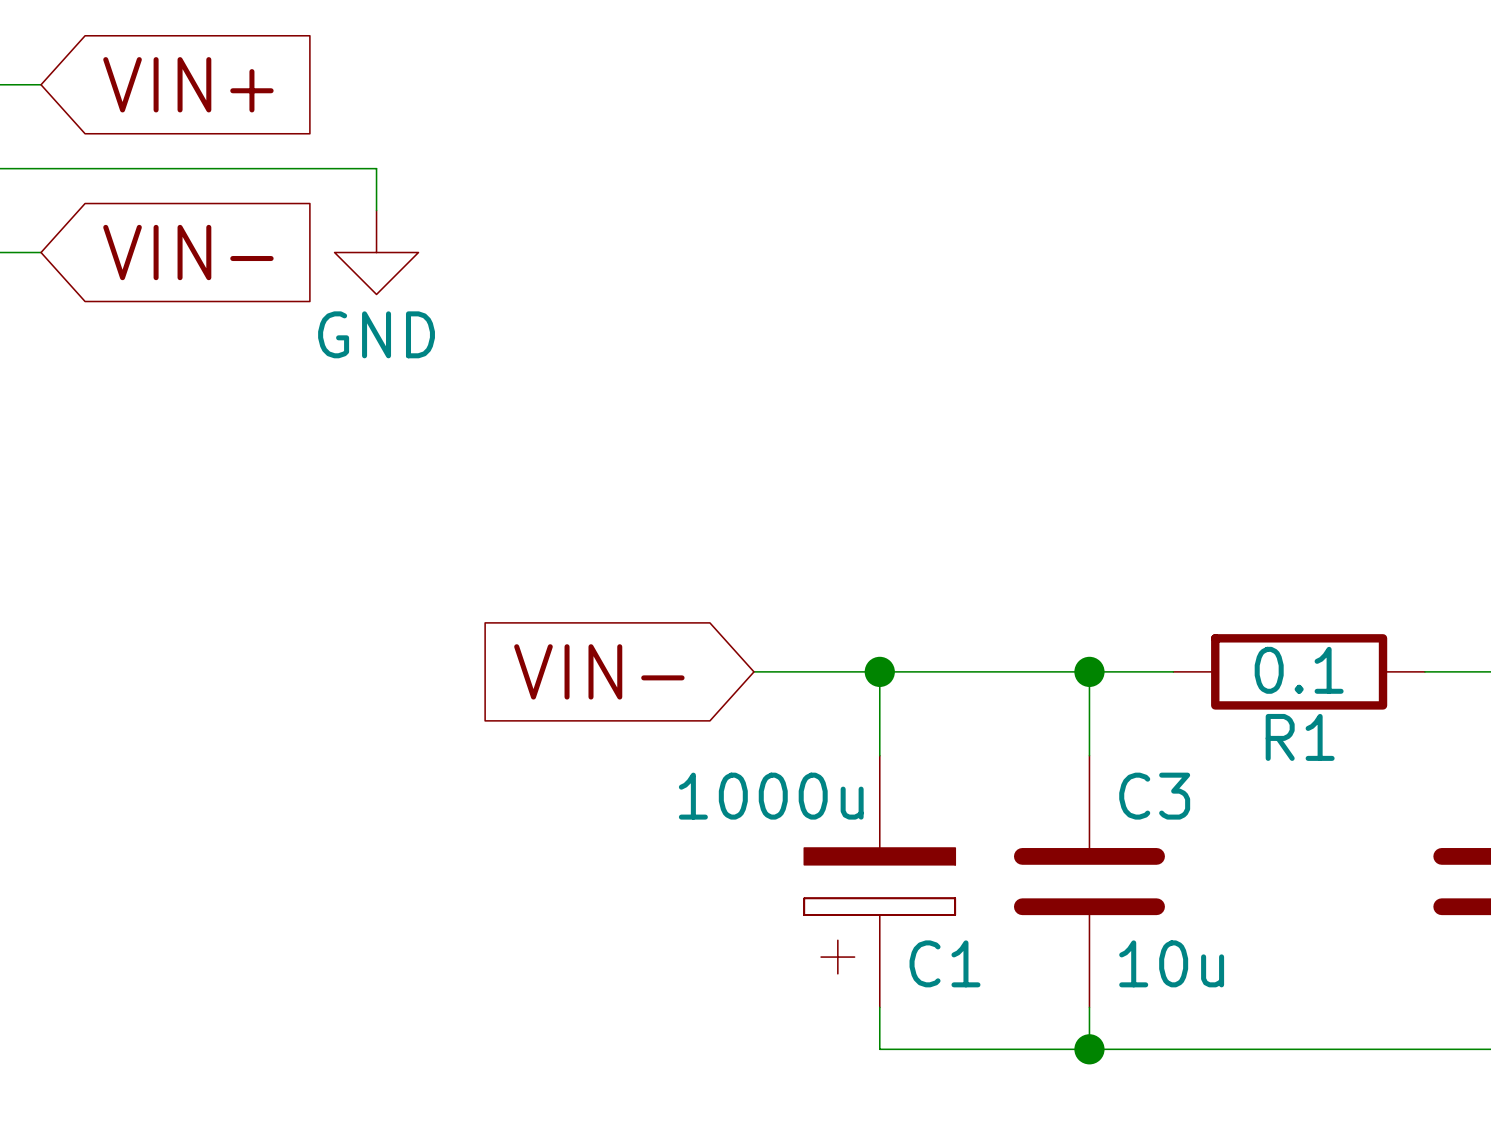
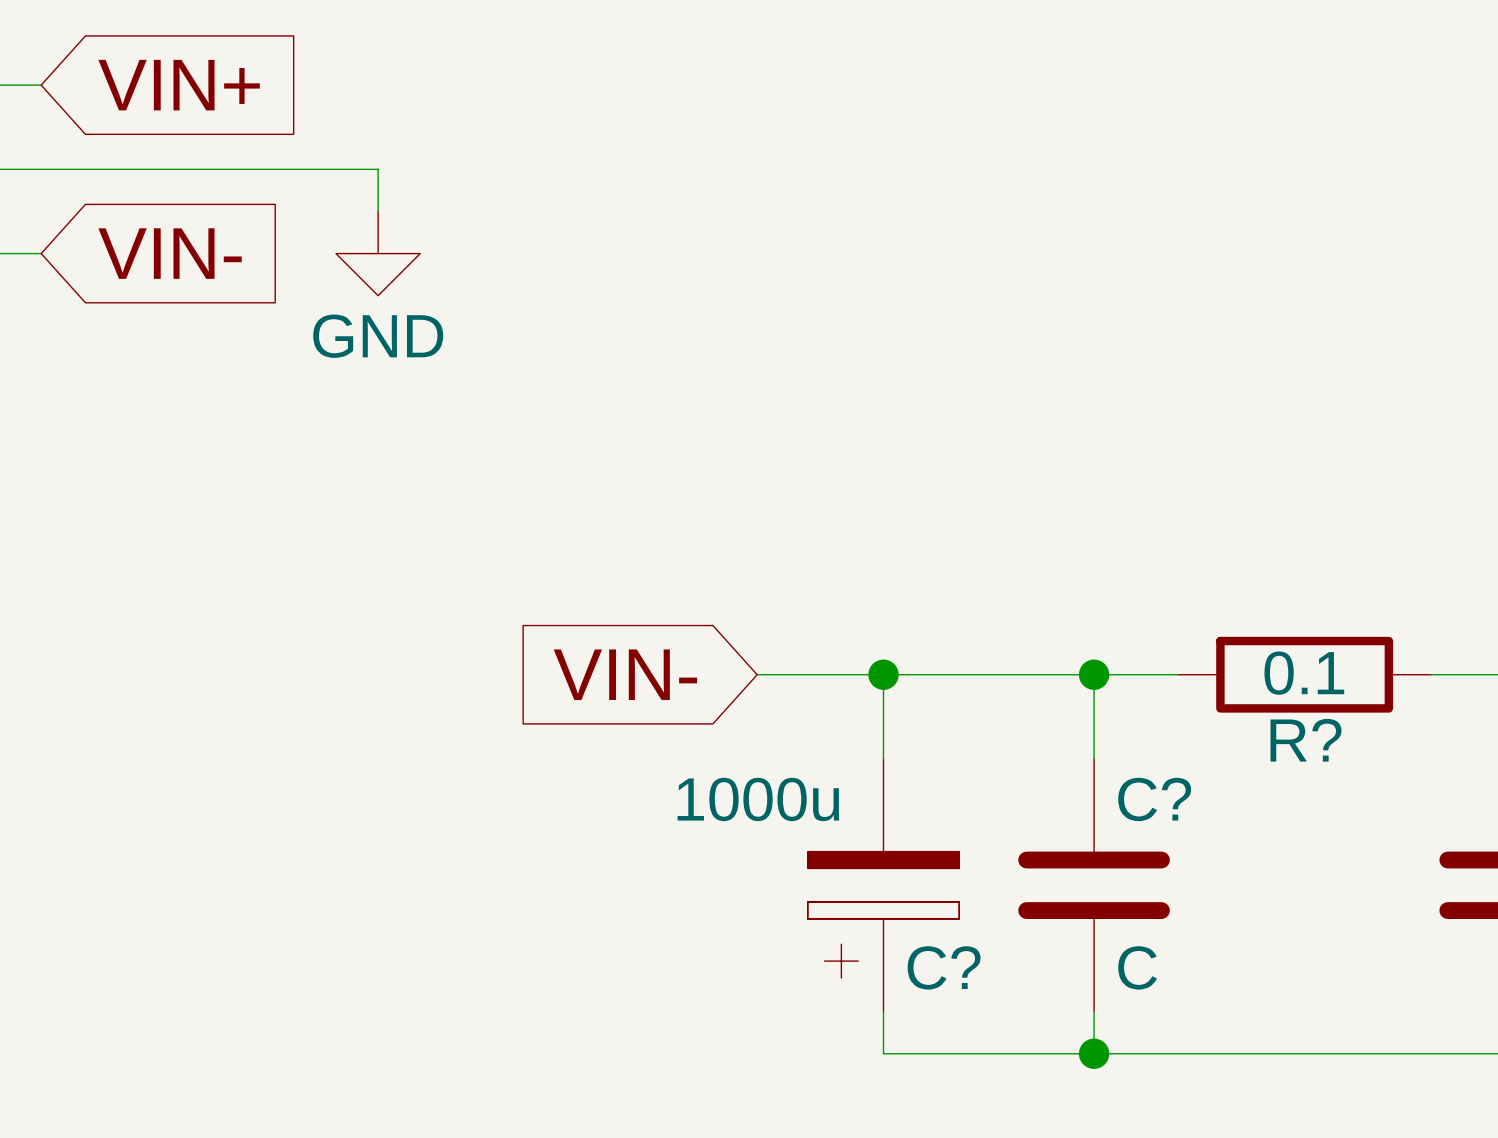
R1 name: R1 (1300, 737) -> R? (1306, 740)
C3 name: C3 (1154, 796) -> C? (1154, 799)
C1 name: C1 (944, 963) -> C? (944, 967)
C3 value: 10u (1171, 963) -> C (1137, 967)

